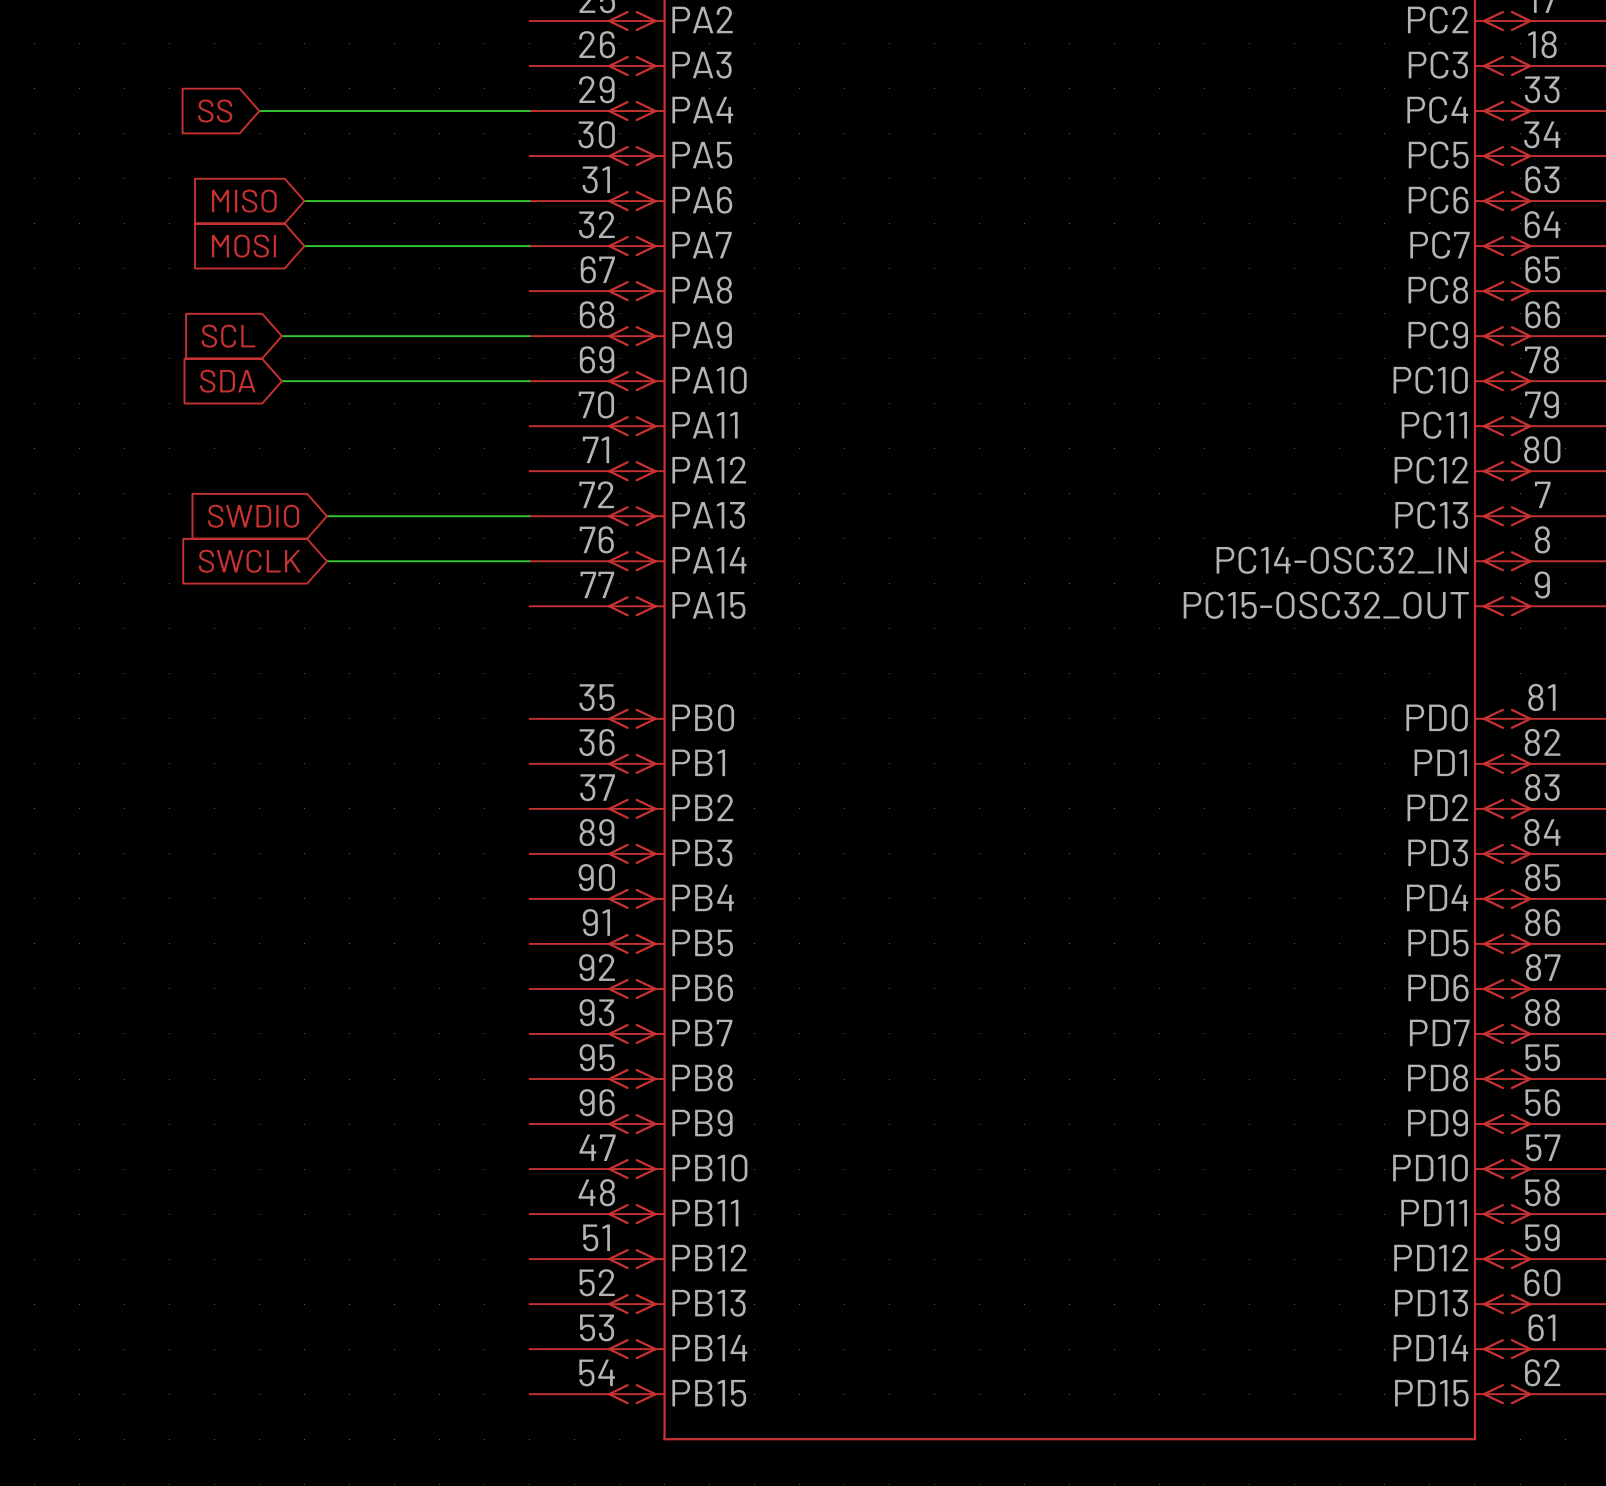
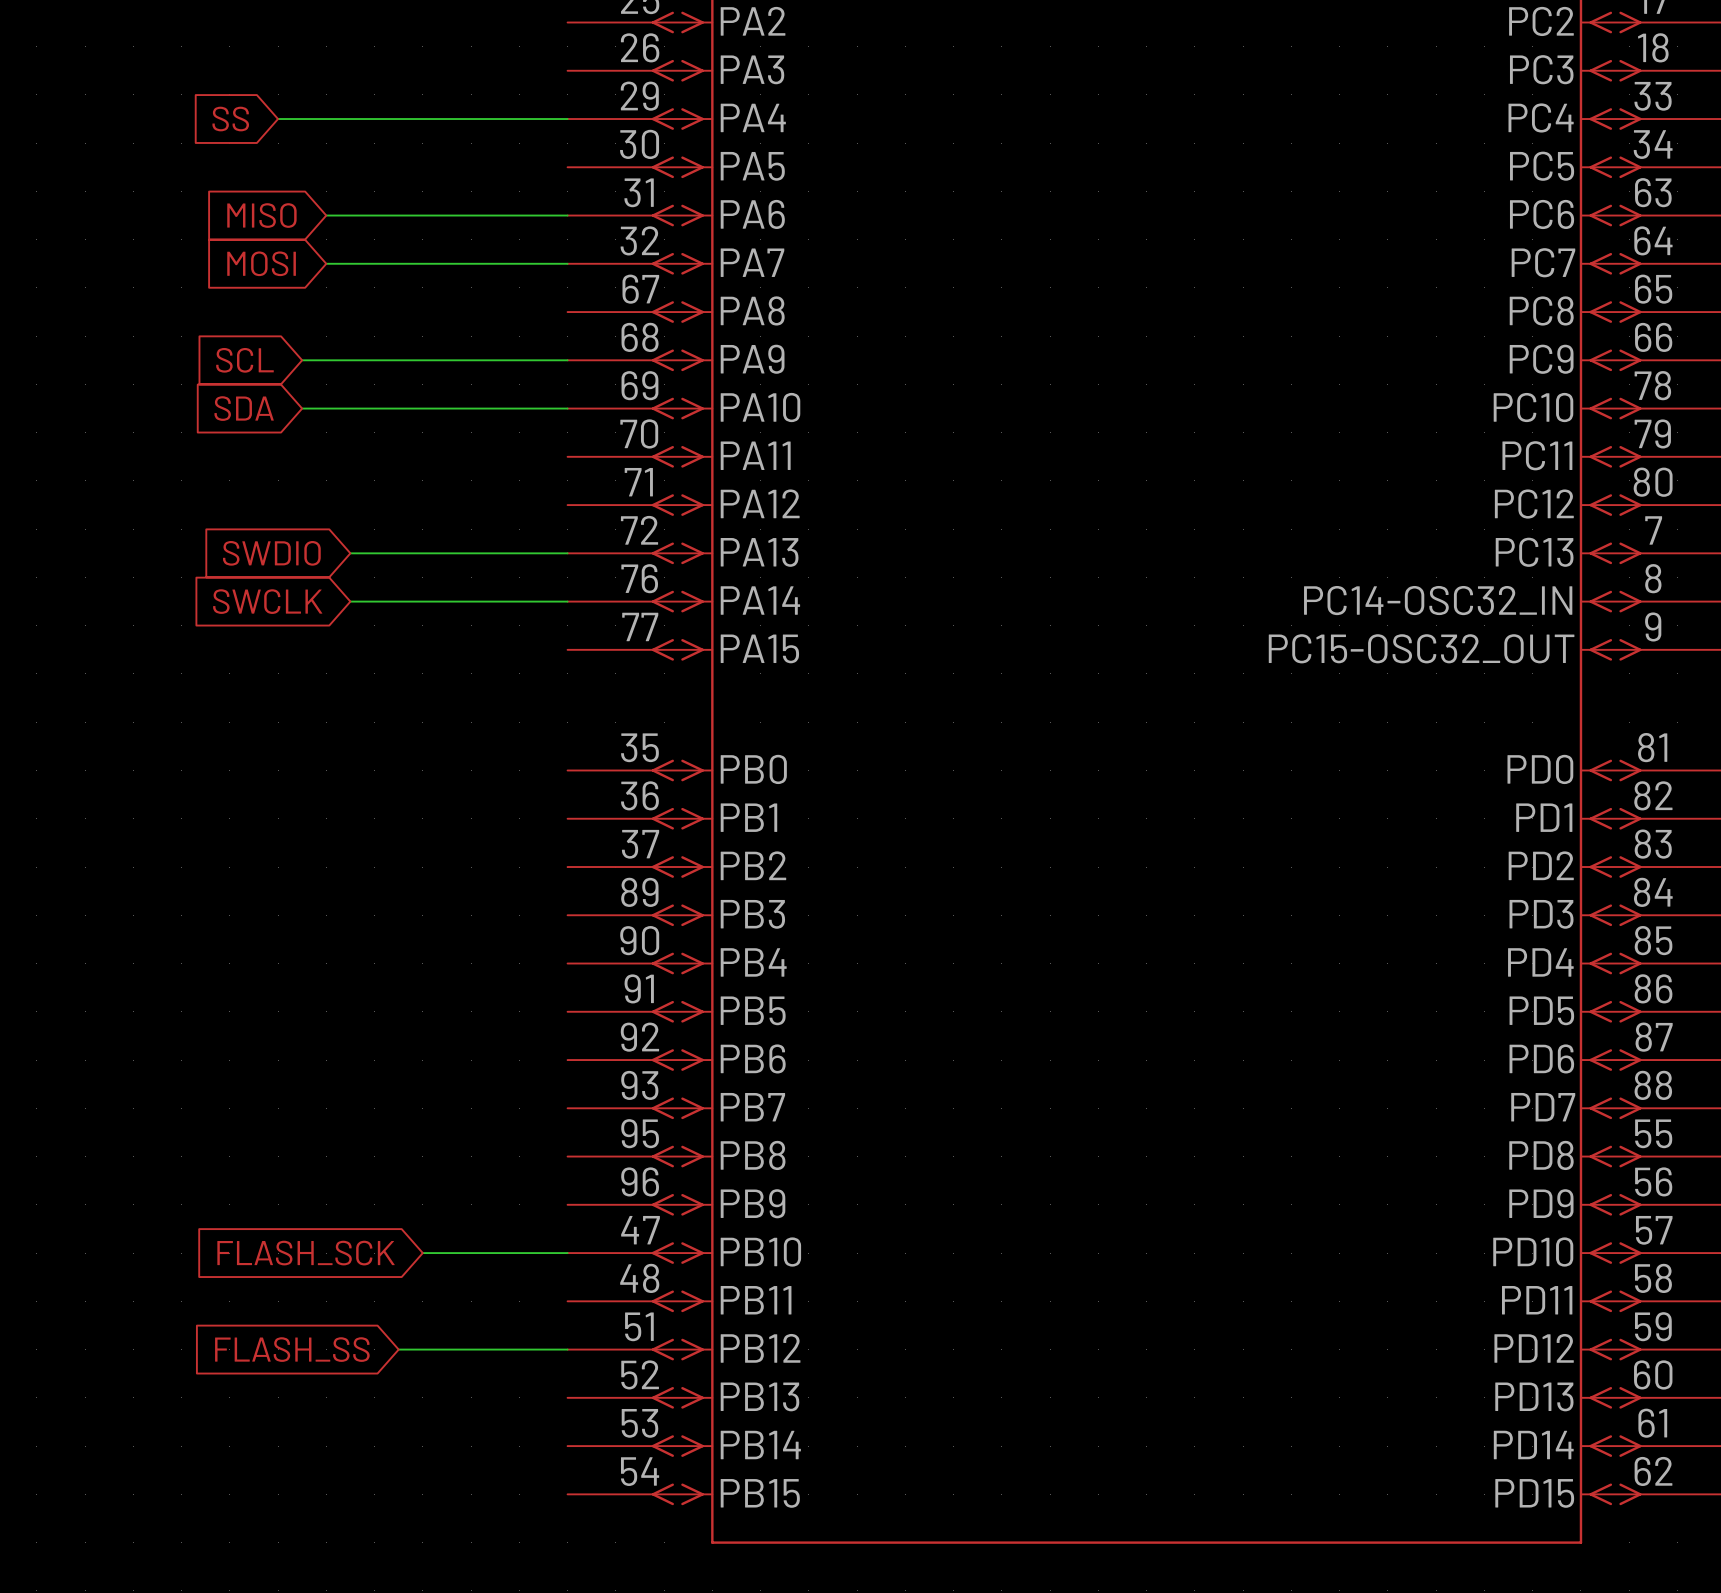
global label: none -> FLASH_SCK (306, 1253)
wire: none -> (422, 1253) (567, 1253)
global label: none -> FLASH_SS (292, 1349)
wire: none -> (398, 1349) (567, 1349)

